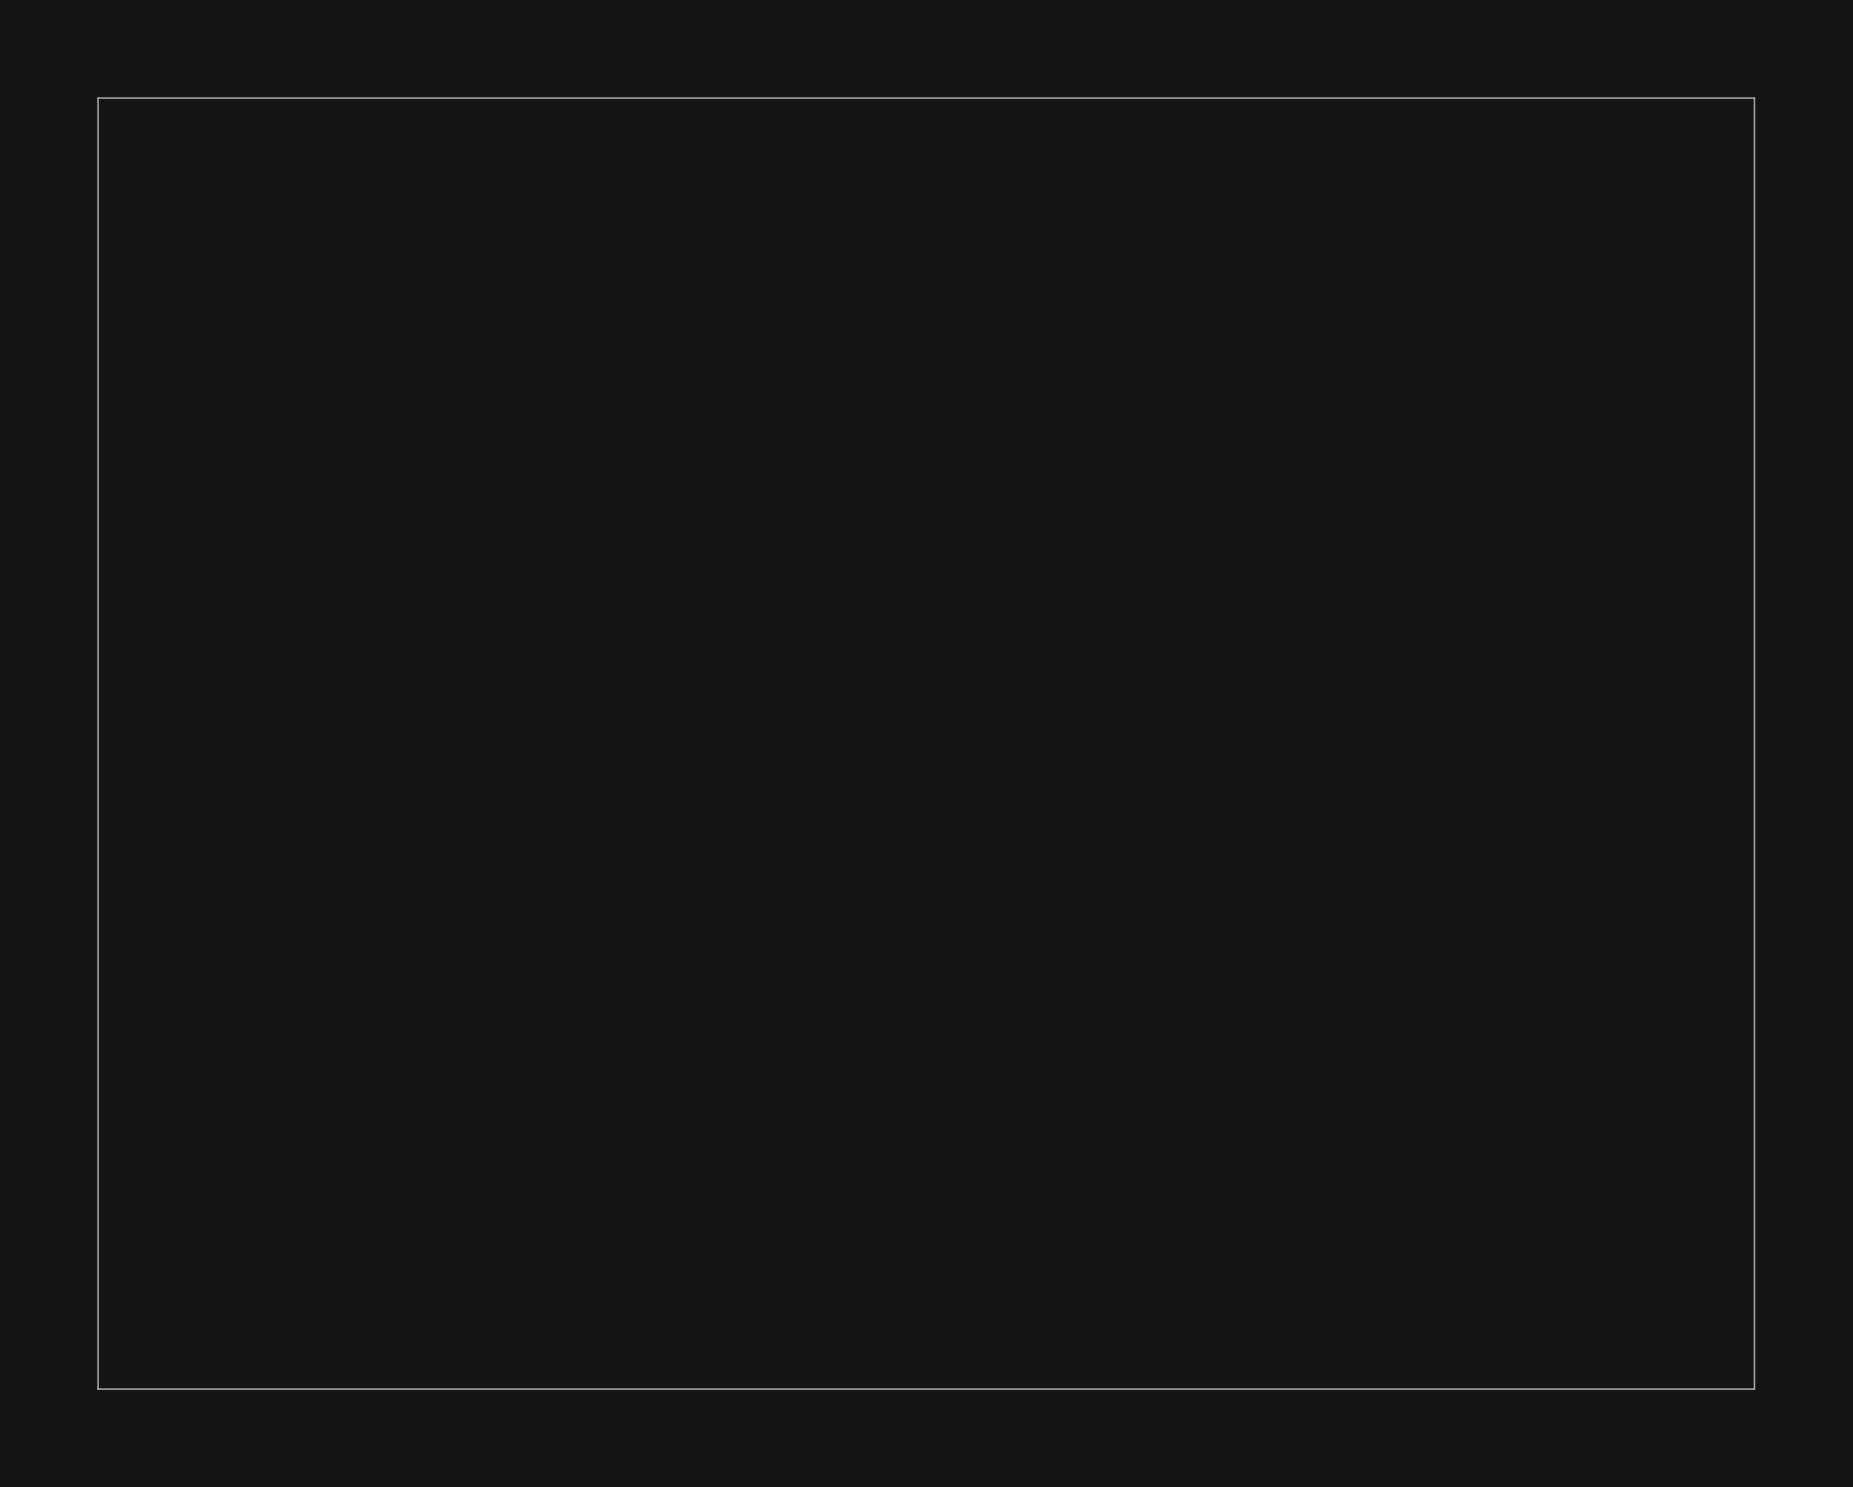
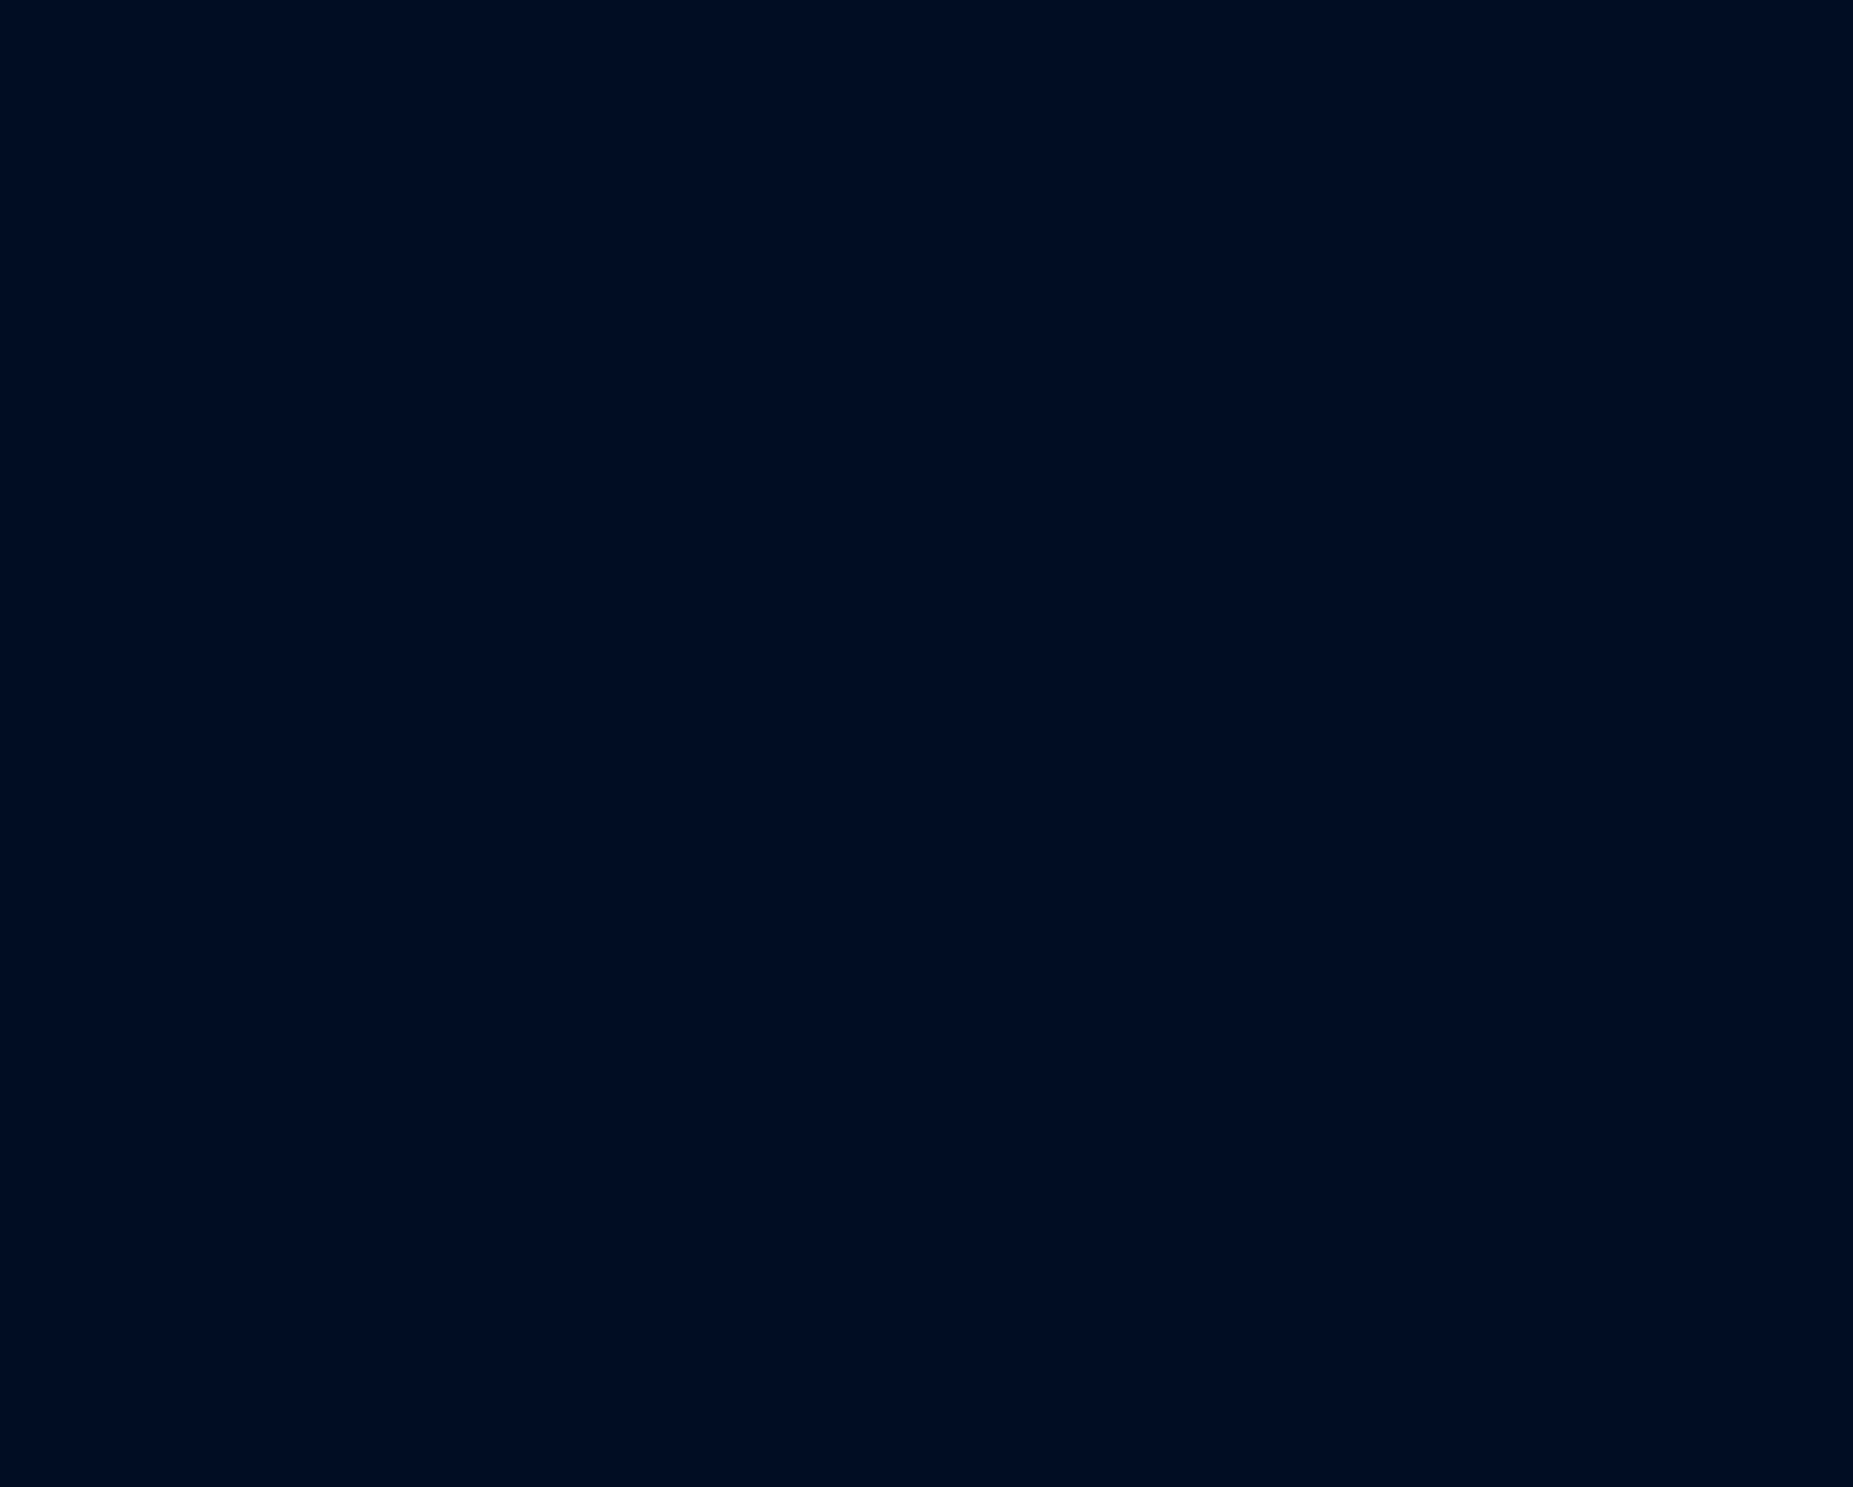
board edge: (1754, 98) (98, 98) (98, 1389) (1754, 1389) (1754, 98) -> none

